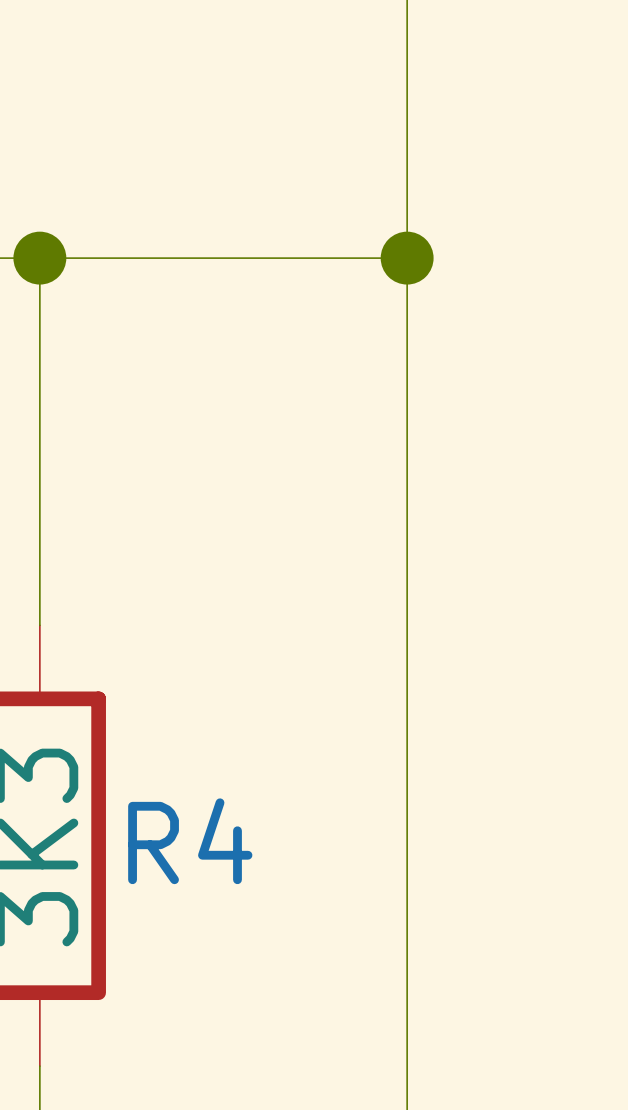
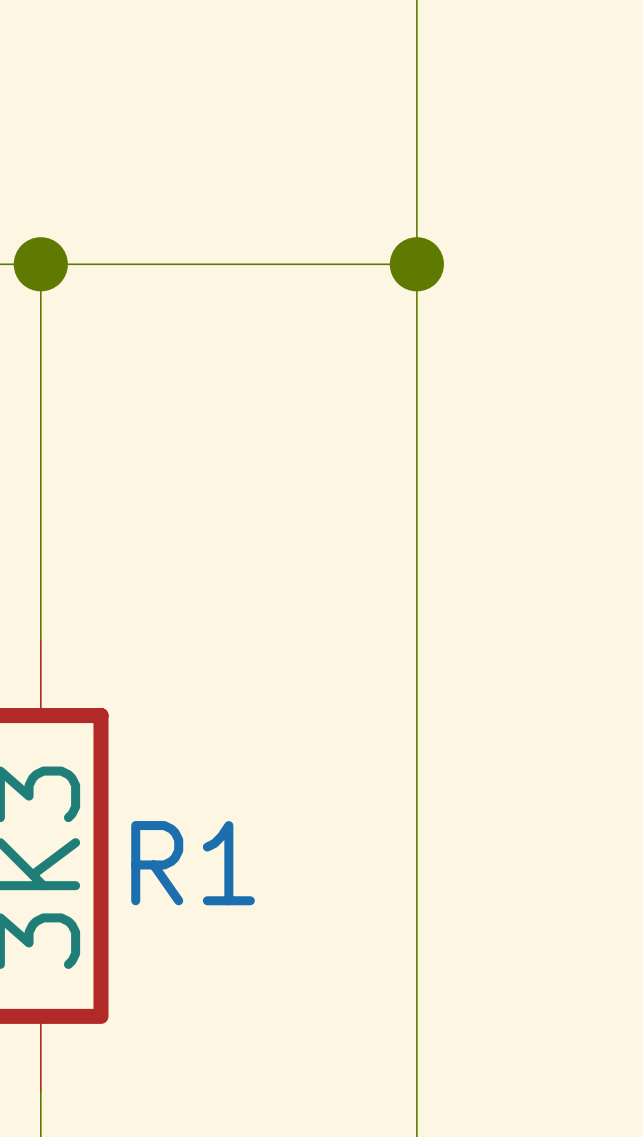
R4 name: R4 (190, 841) -> R1 (193, 863)

